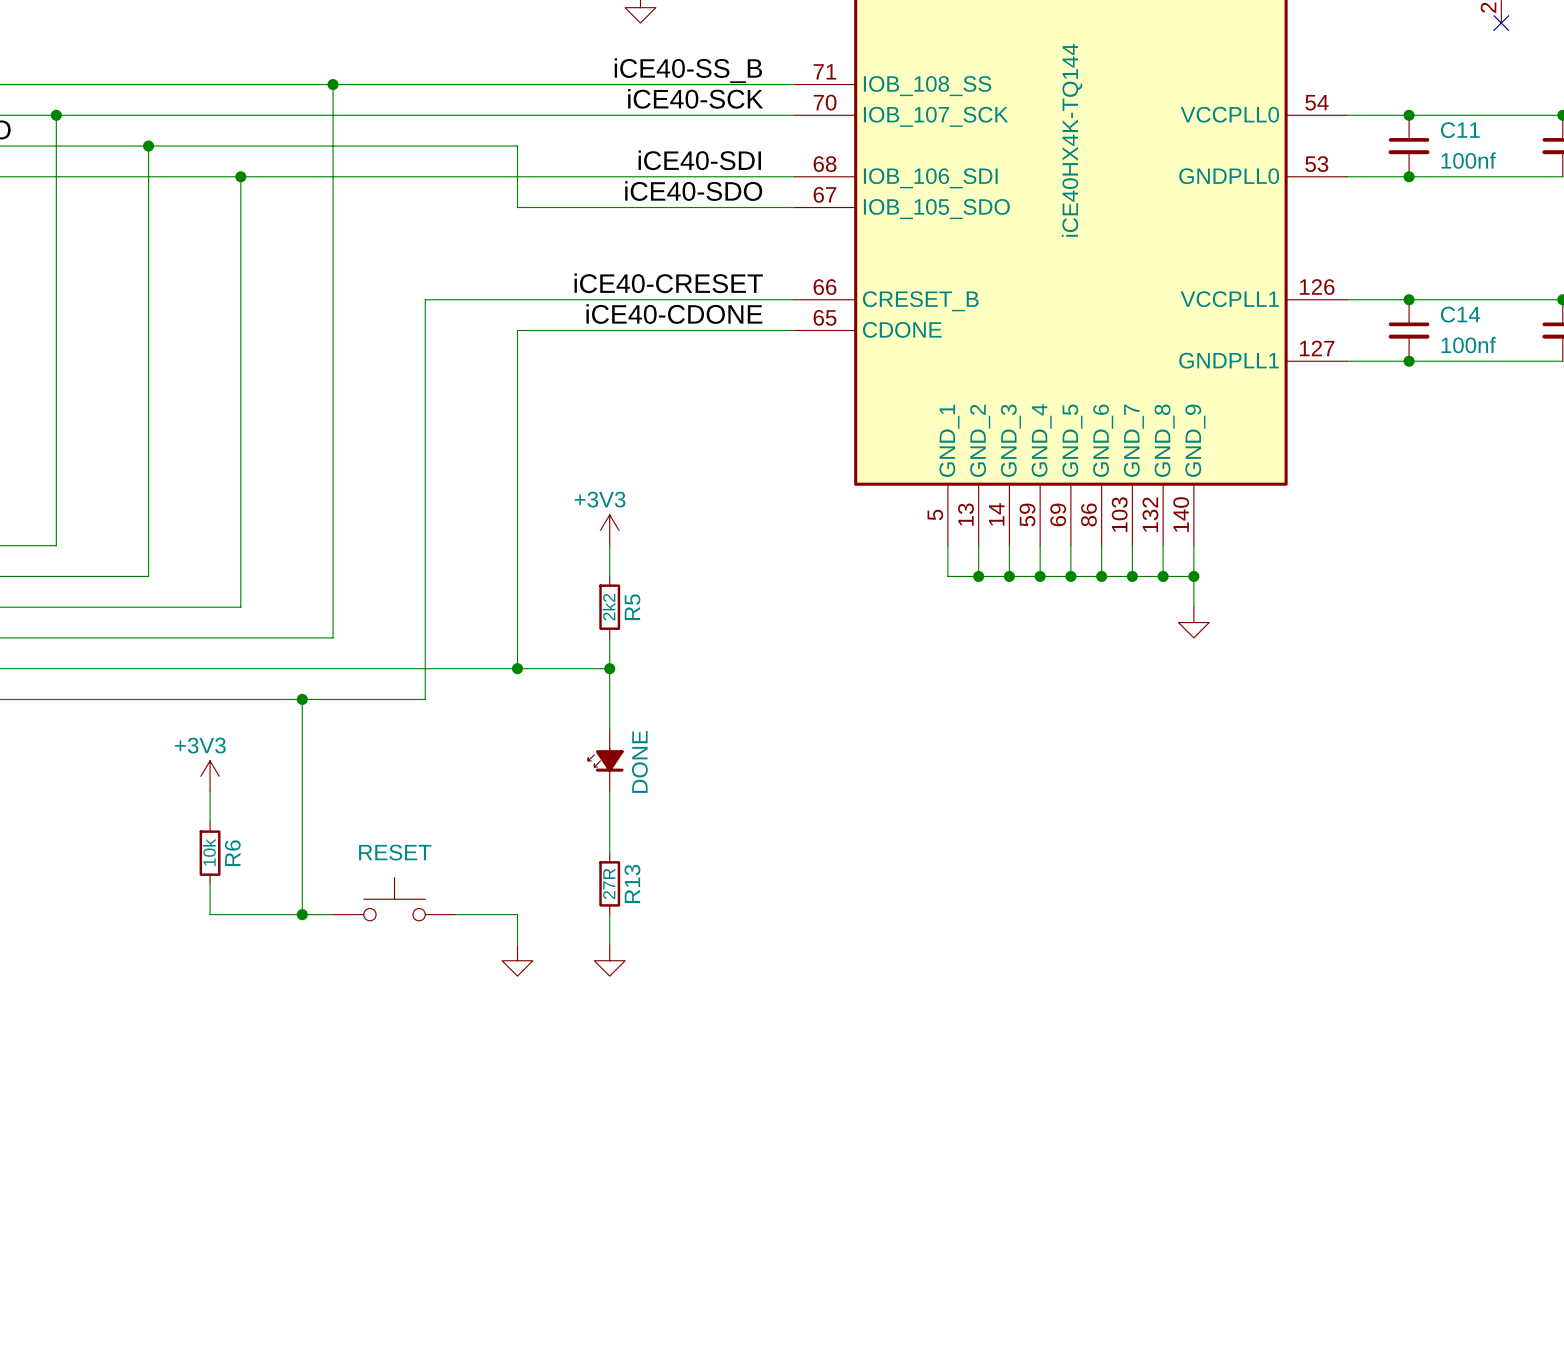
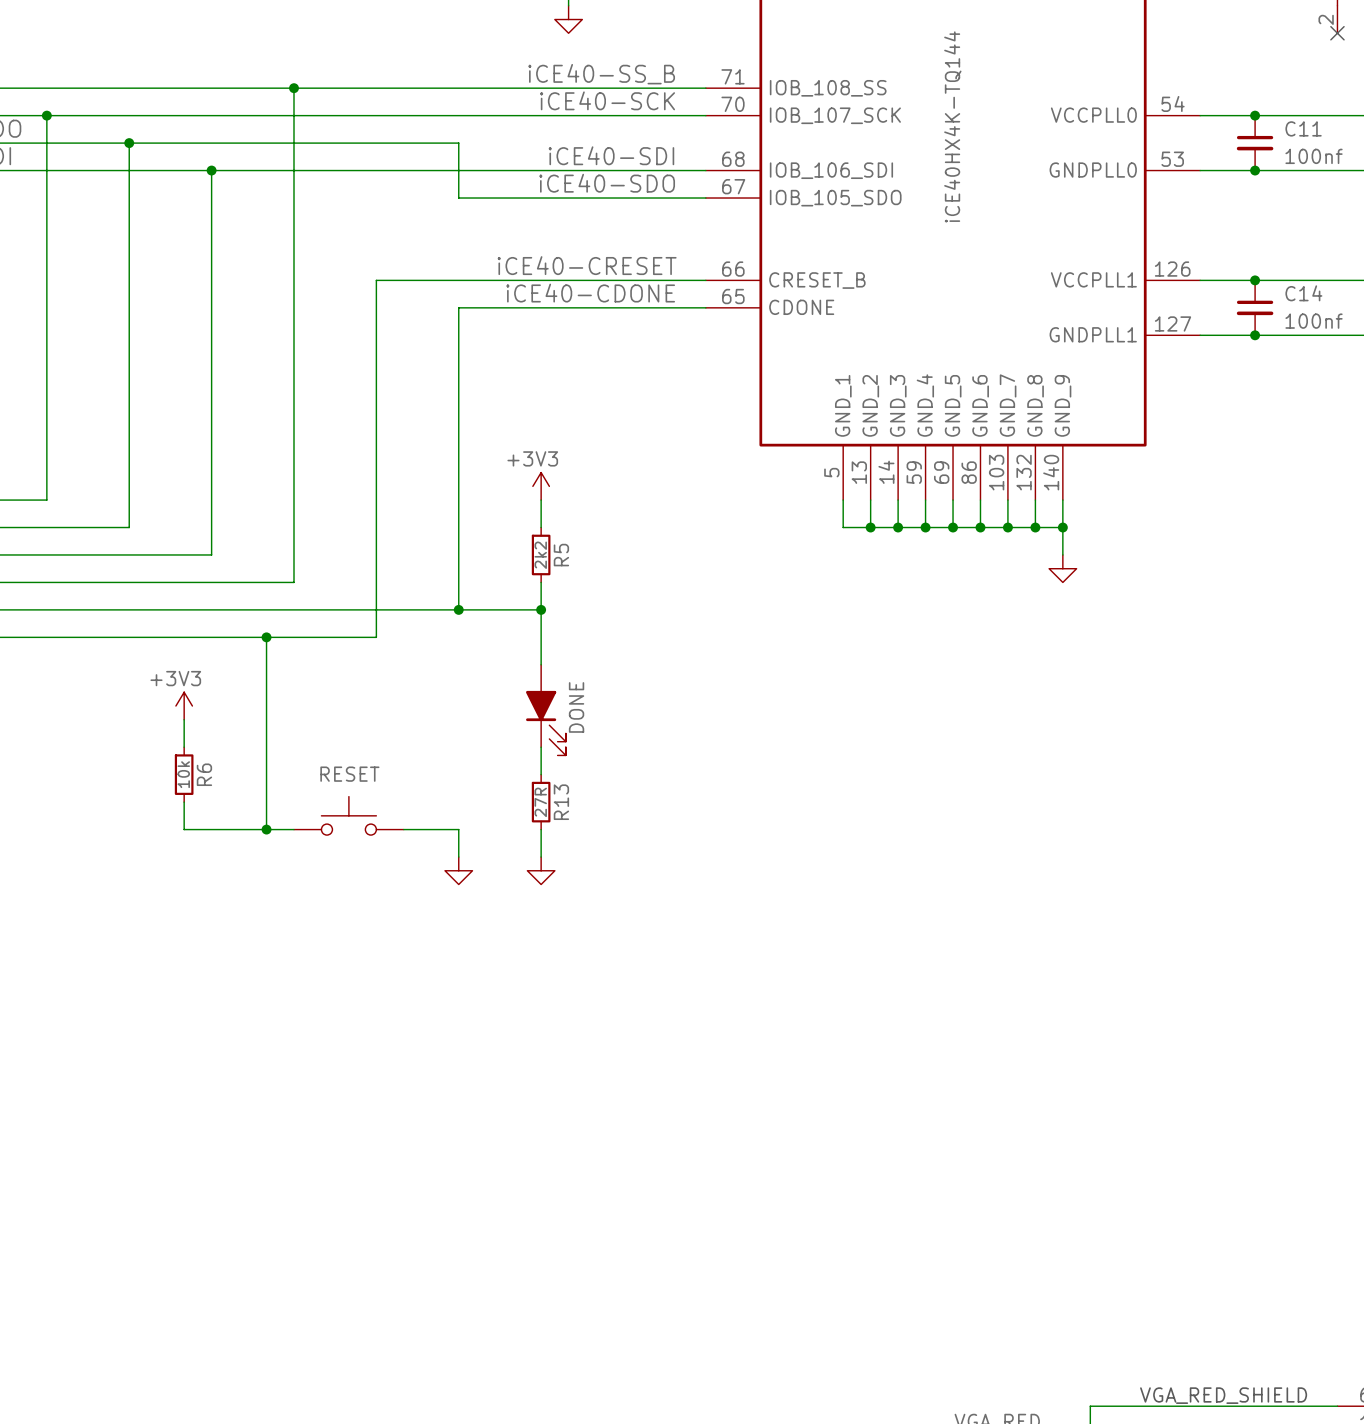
part: DONE (605, 760) -> none
part: none -> DONE (545, 710)

